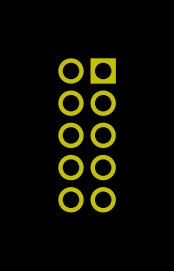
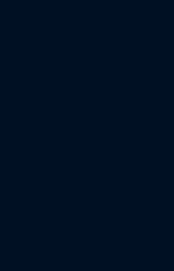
part: (87, 135) -> none

